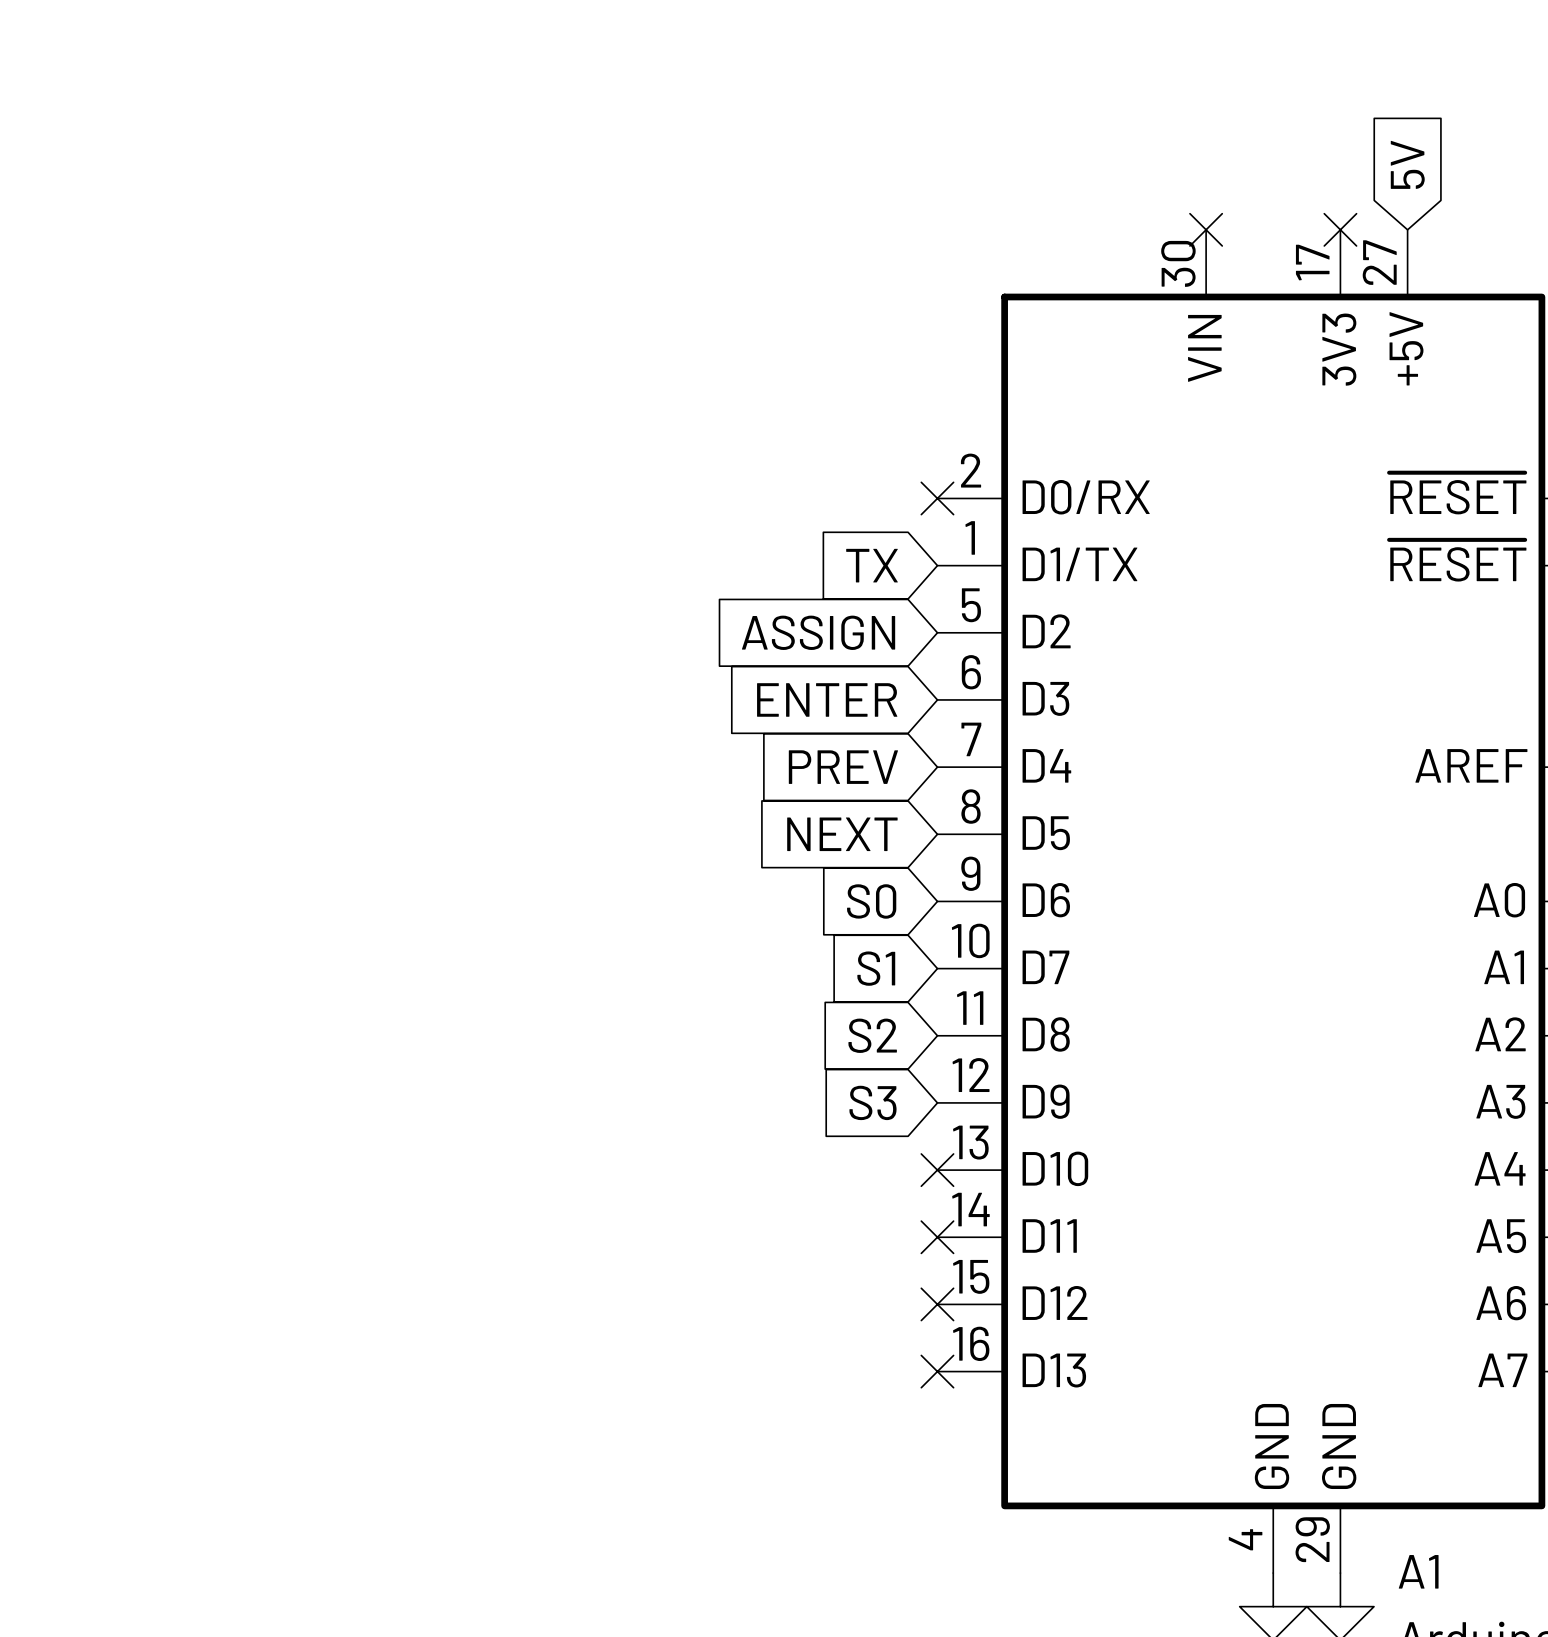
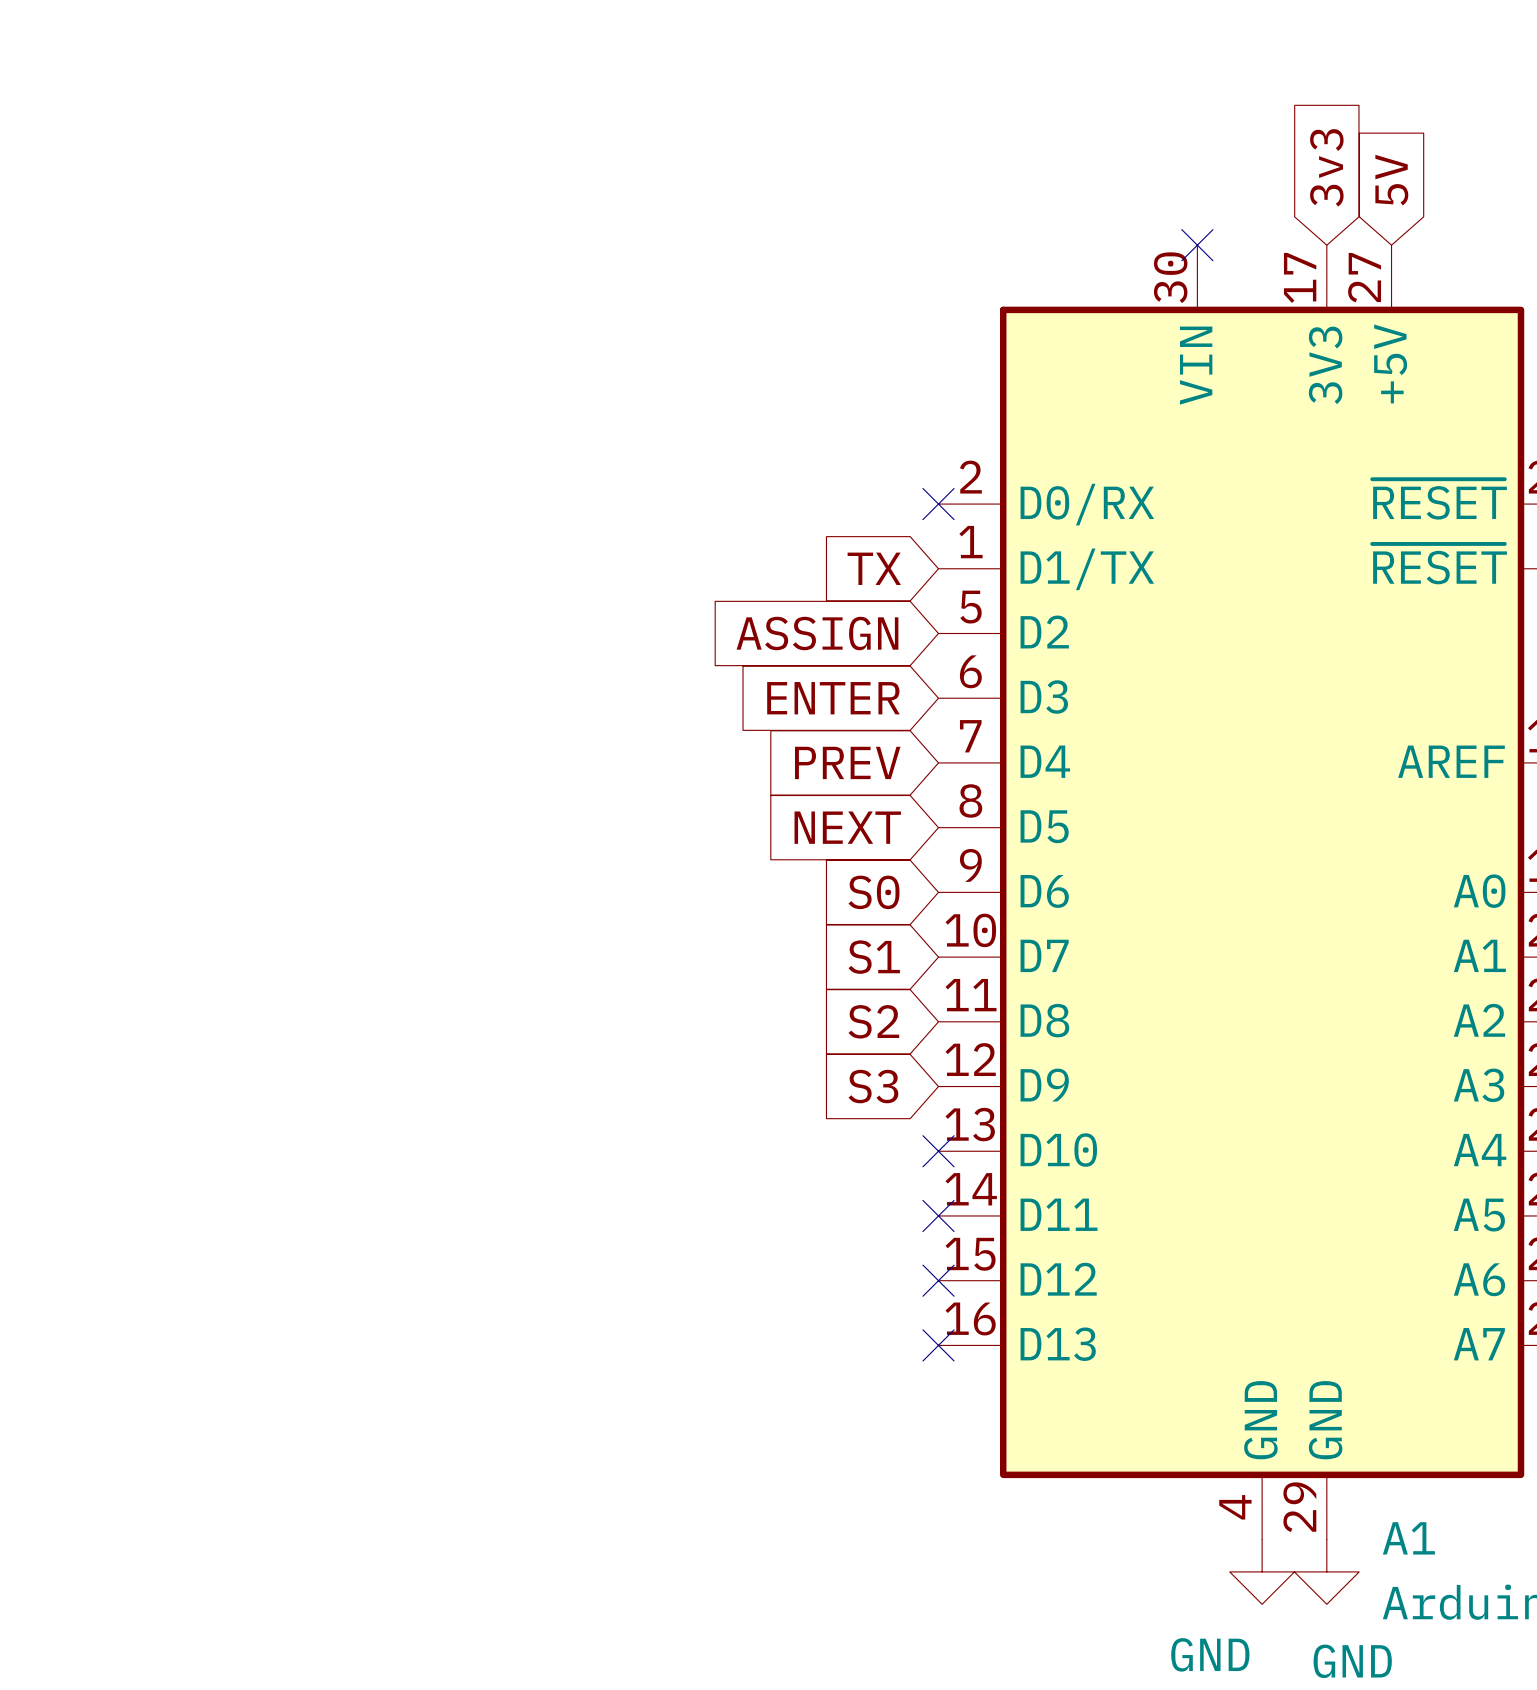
global label: none -> 3v3 (1326, 167)
no-connect mark: (1340, 229) -> none

